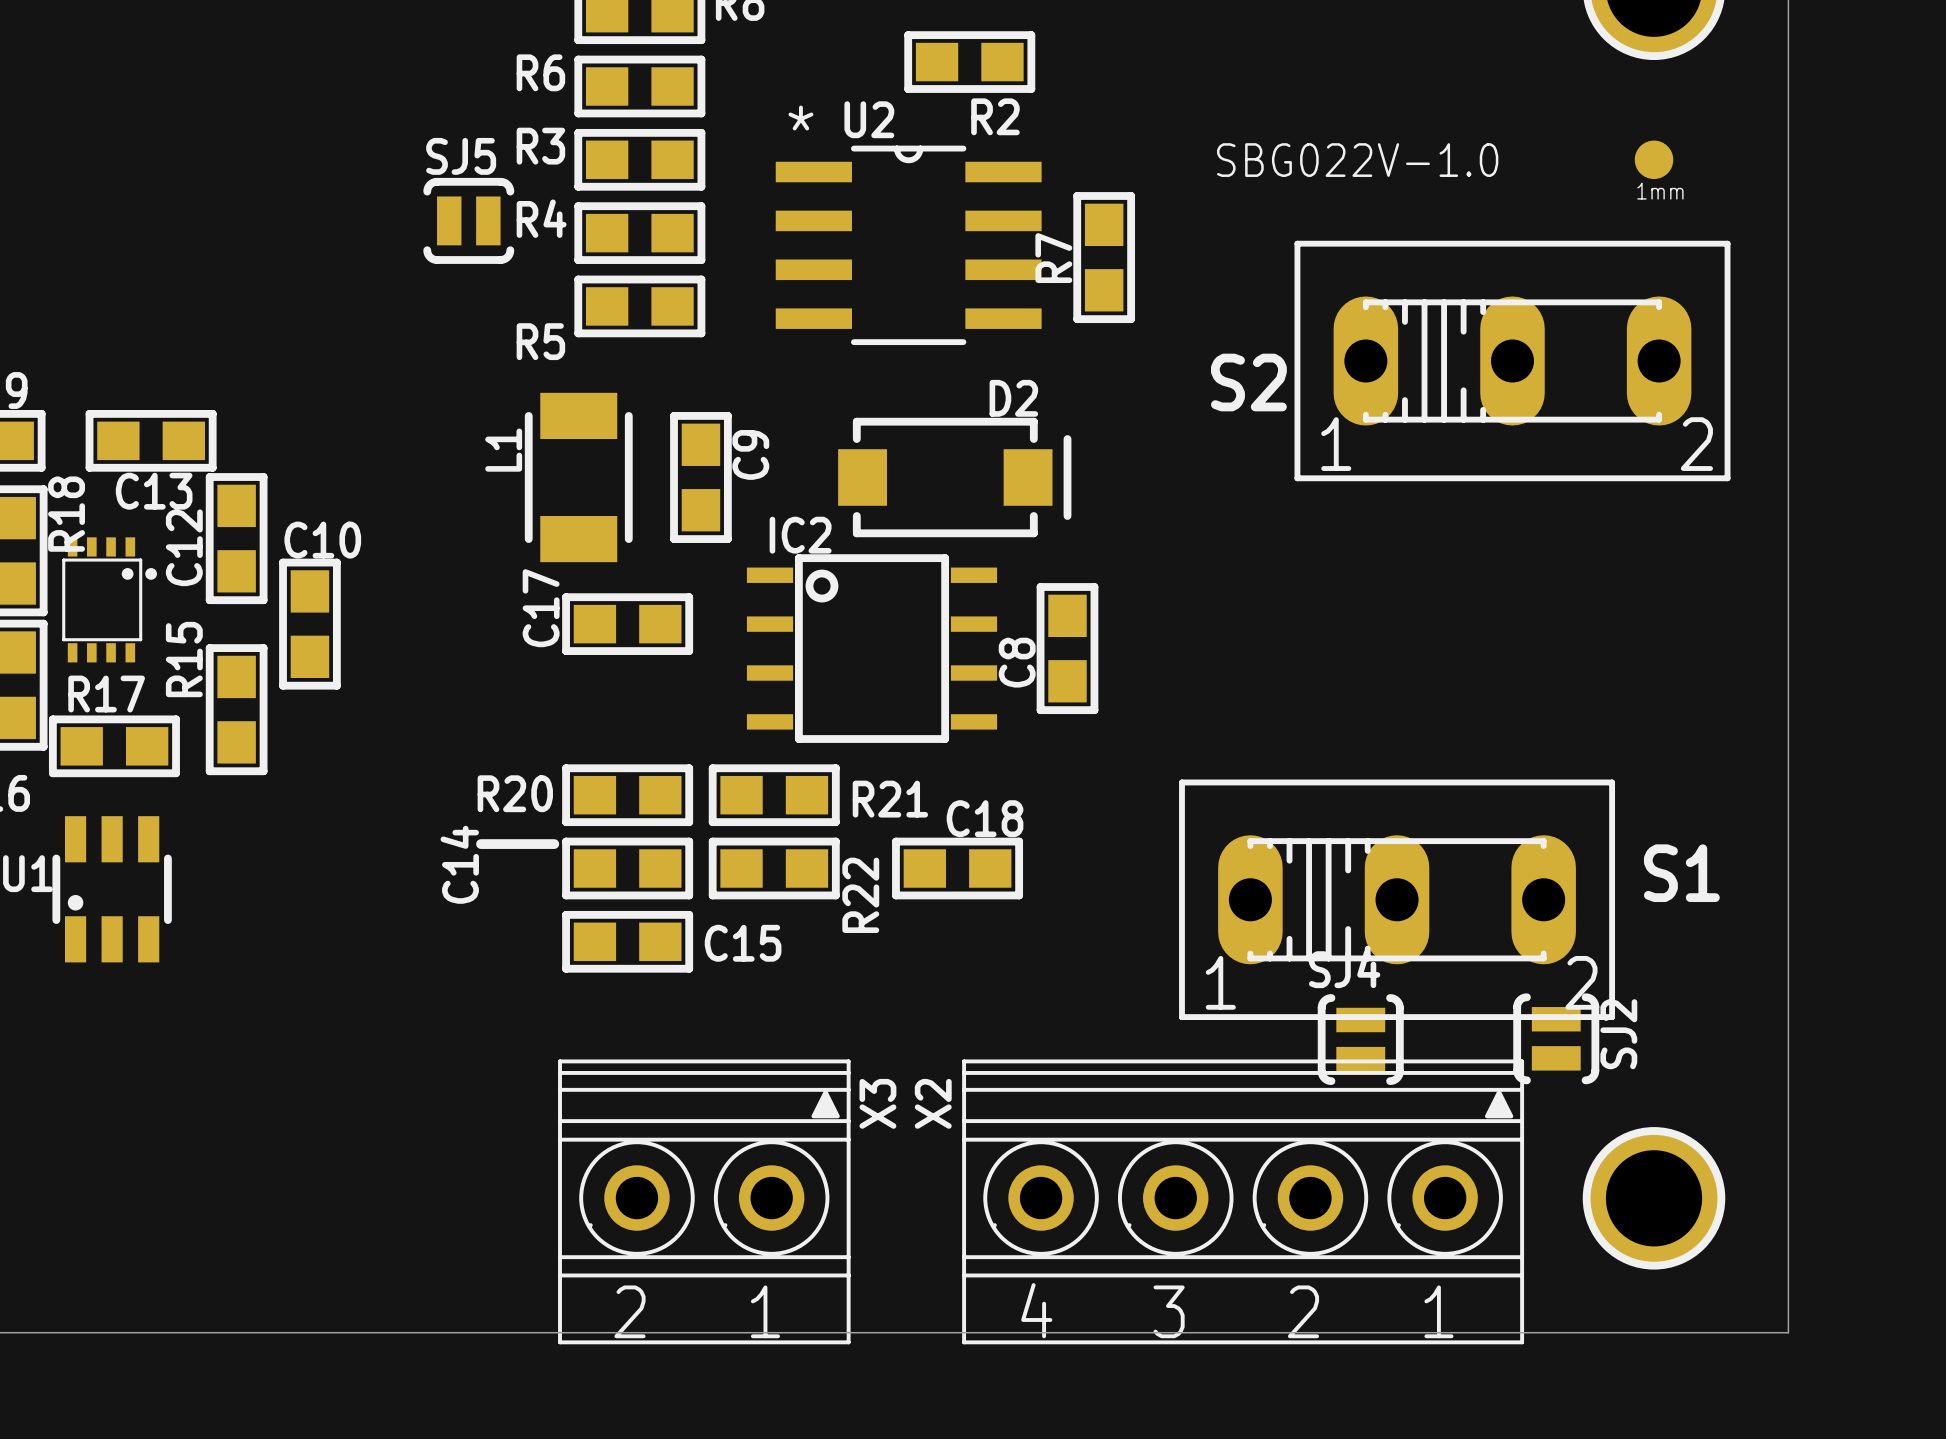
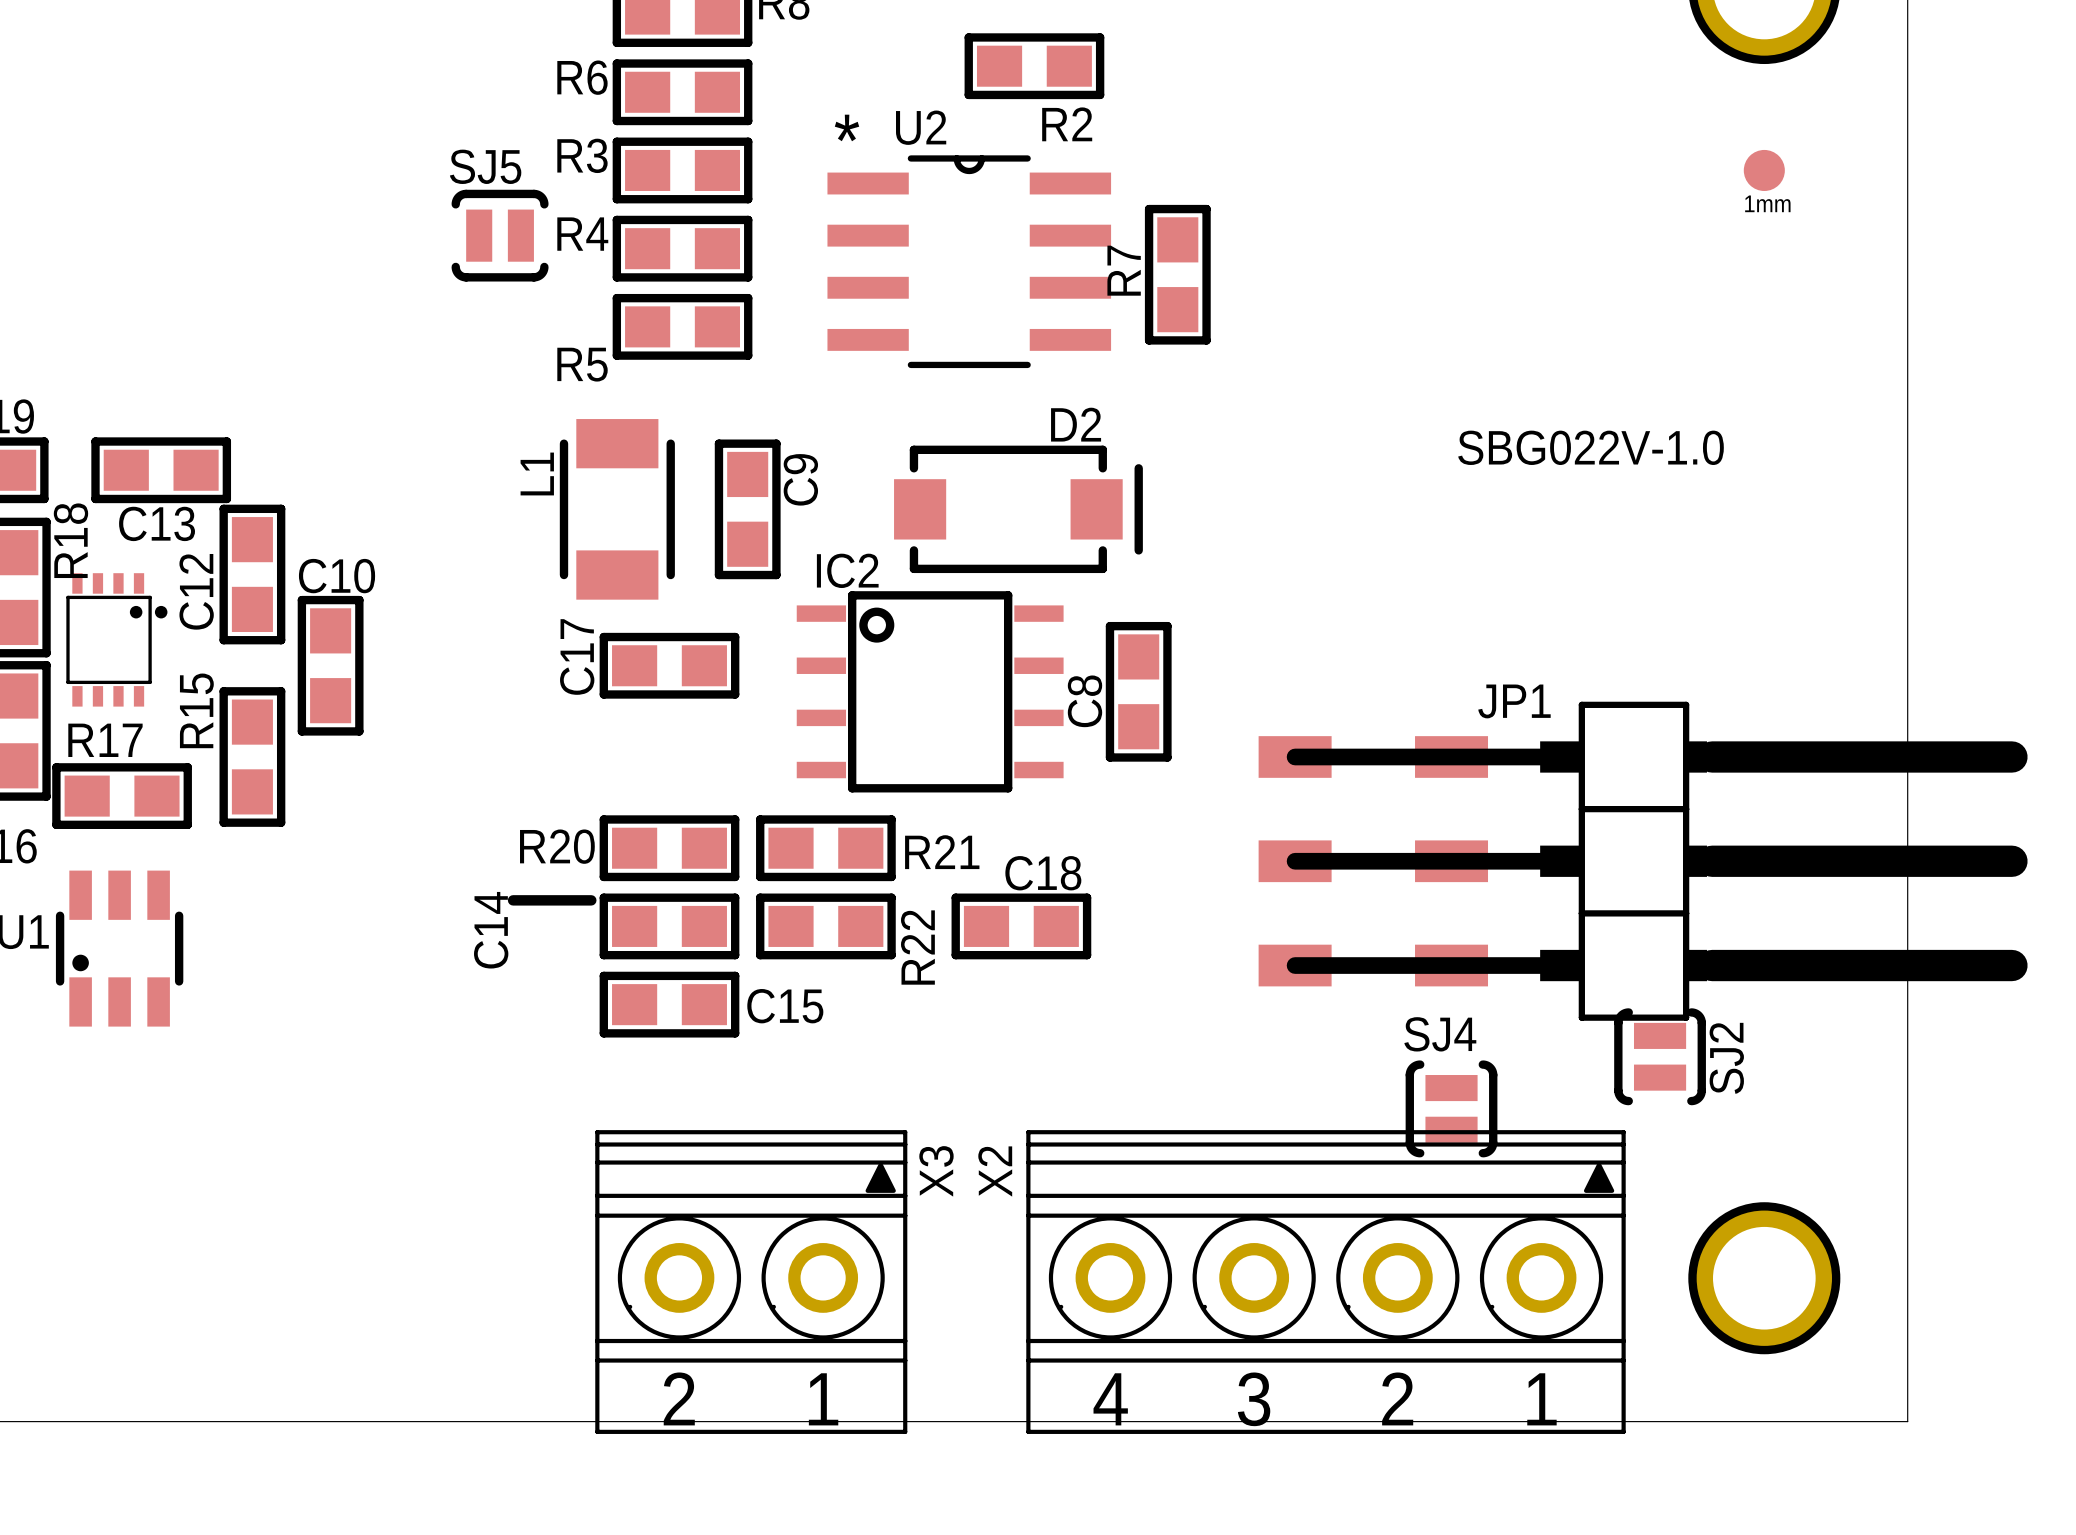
text position: SBG022V-1.0 (1357, 160) -> SBG022V-1.0 (1591, 447)
S2: (1512, 360) -> none
JP1: none -> (1643, 861)
S1: (1397, 899) -> none
SJ2 position: (1556, 1038) -> (1660, 1056)

